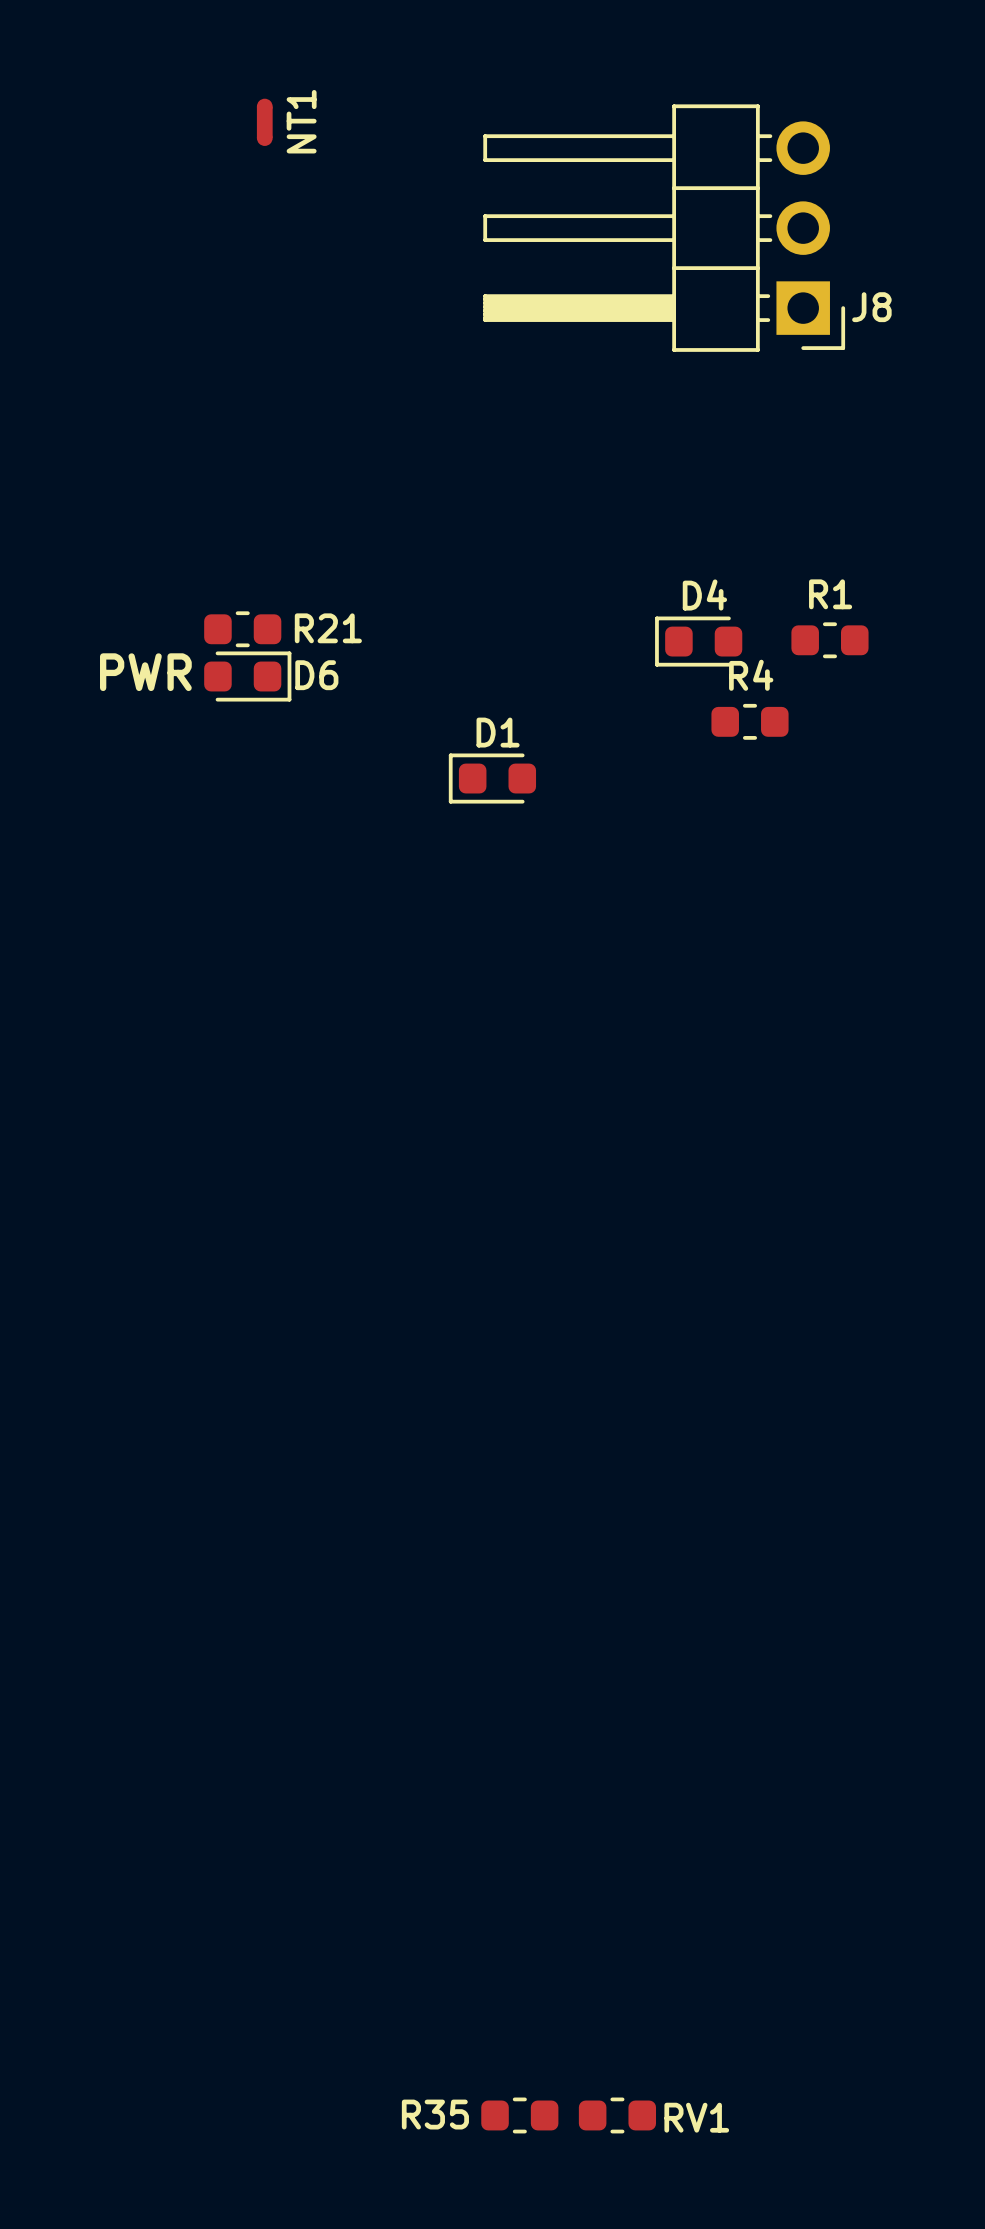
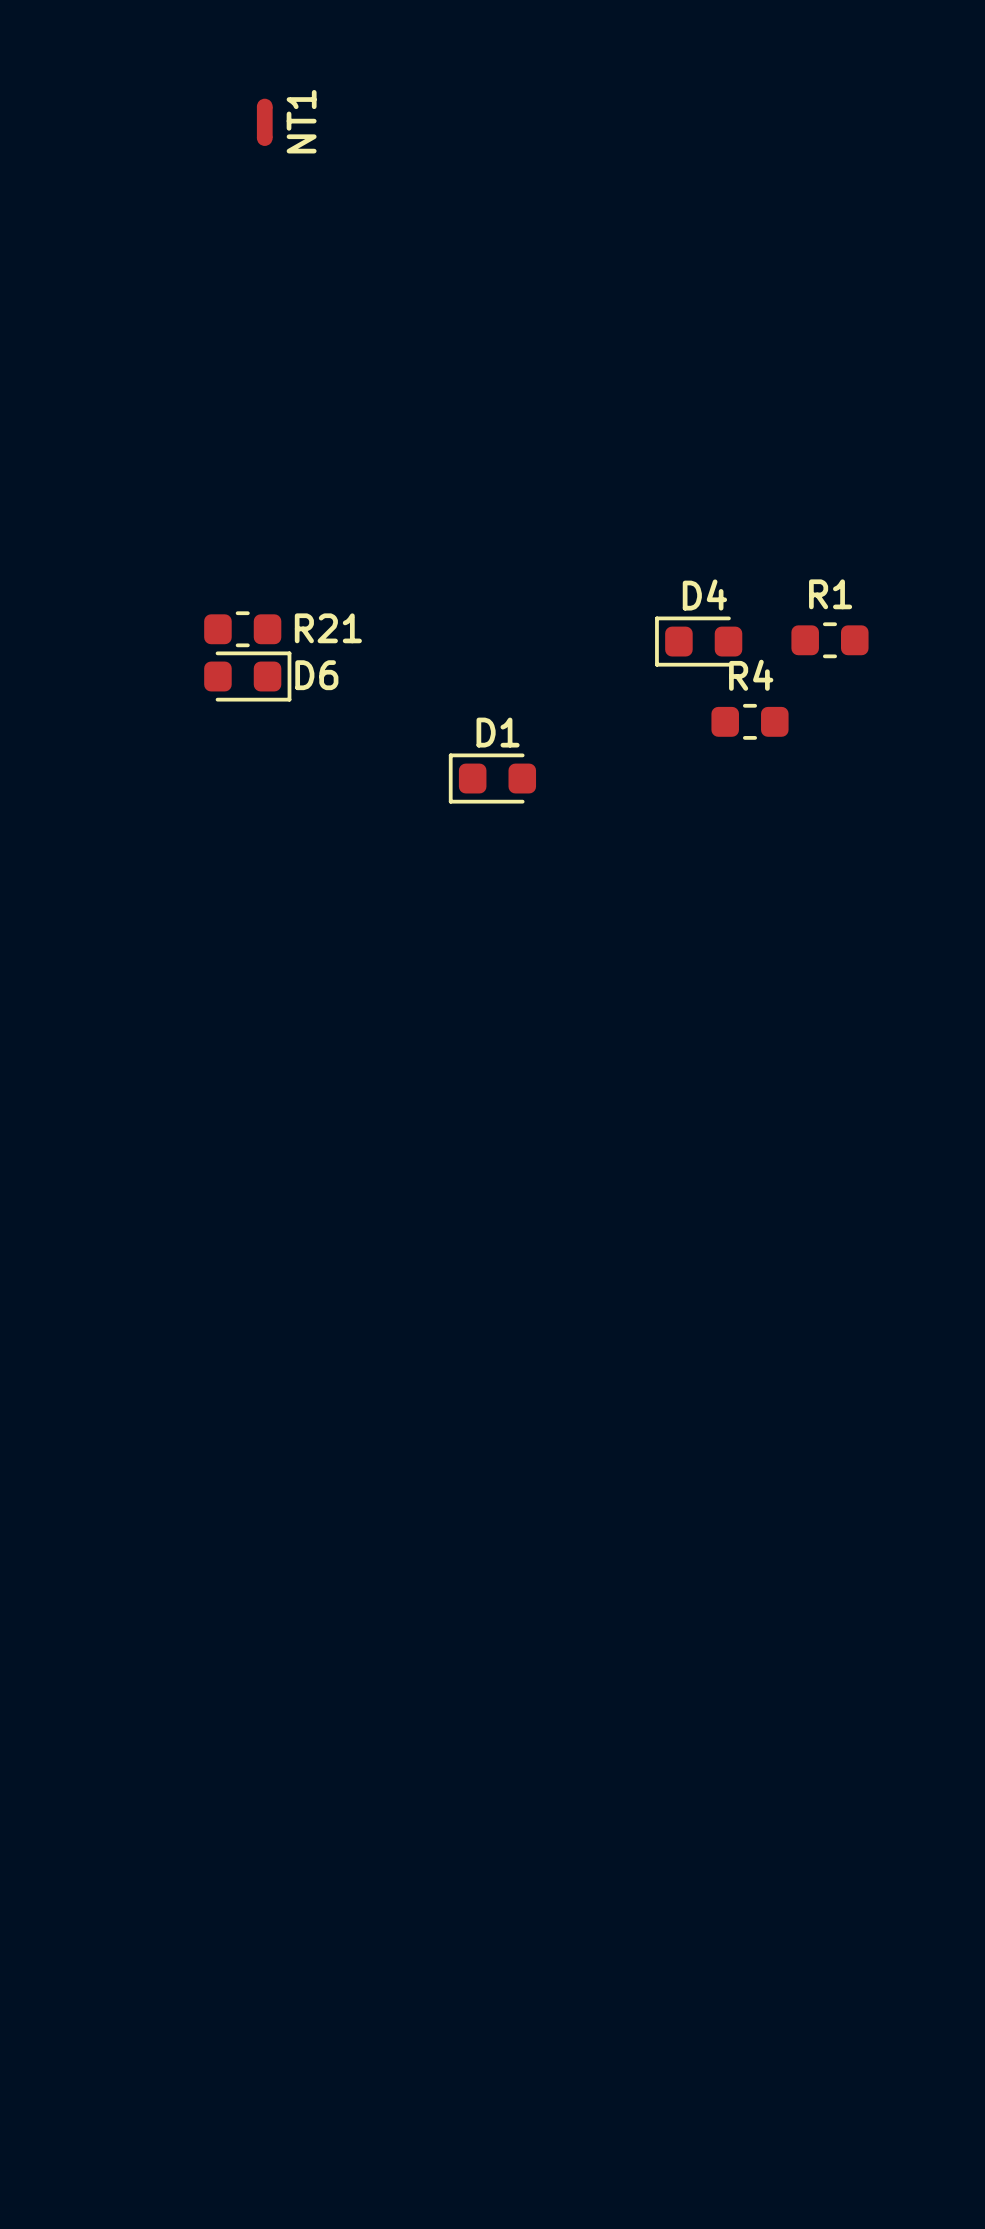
J8: (664, 228) -> none
text: PWR (145, 672) -> none
R35: (519, 2115) -> none
RV1: (617, 2115) -> none

